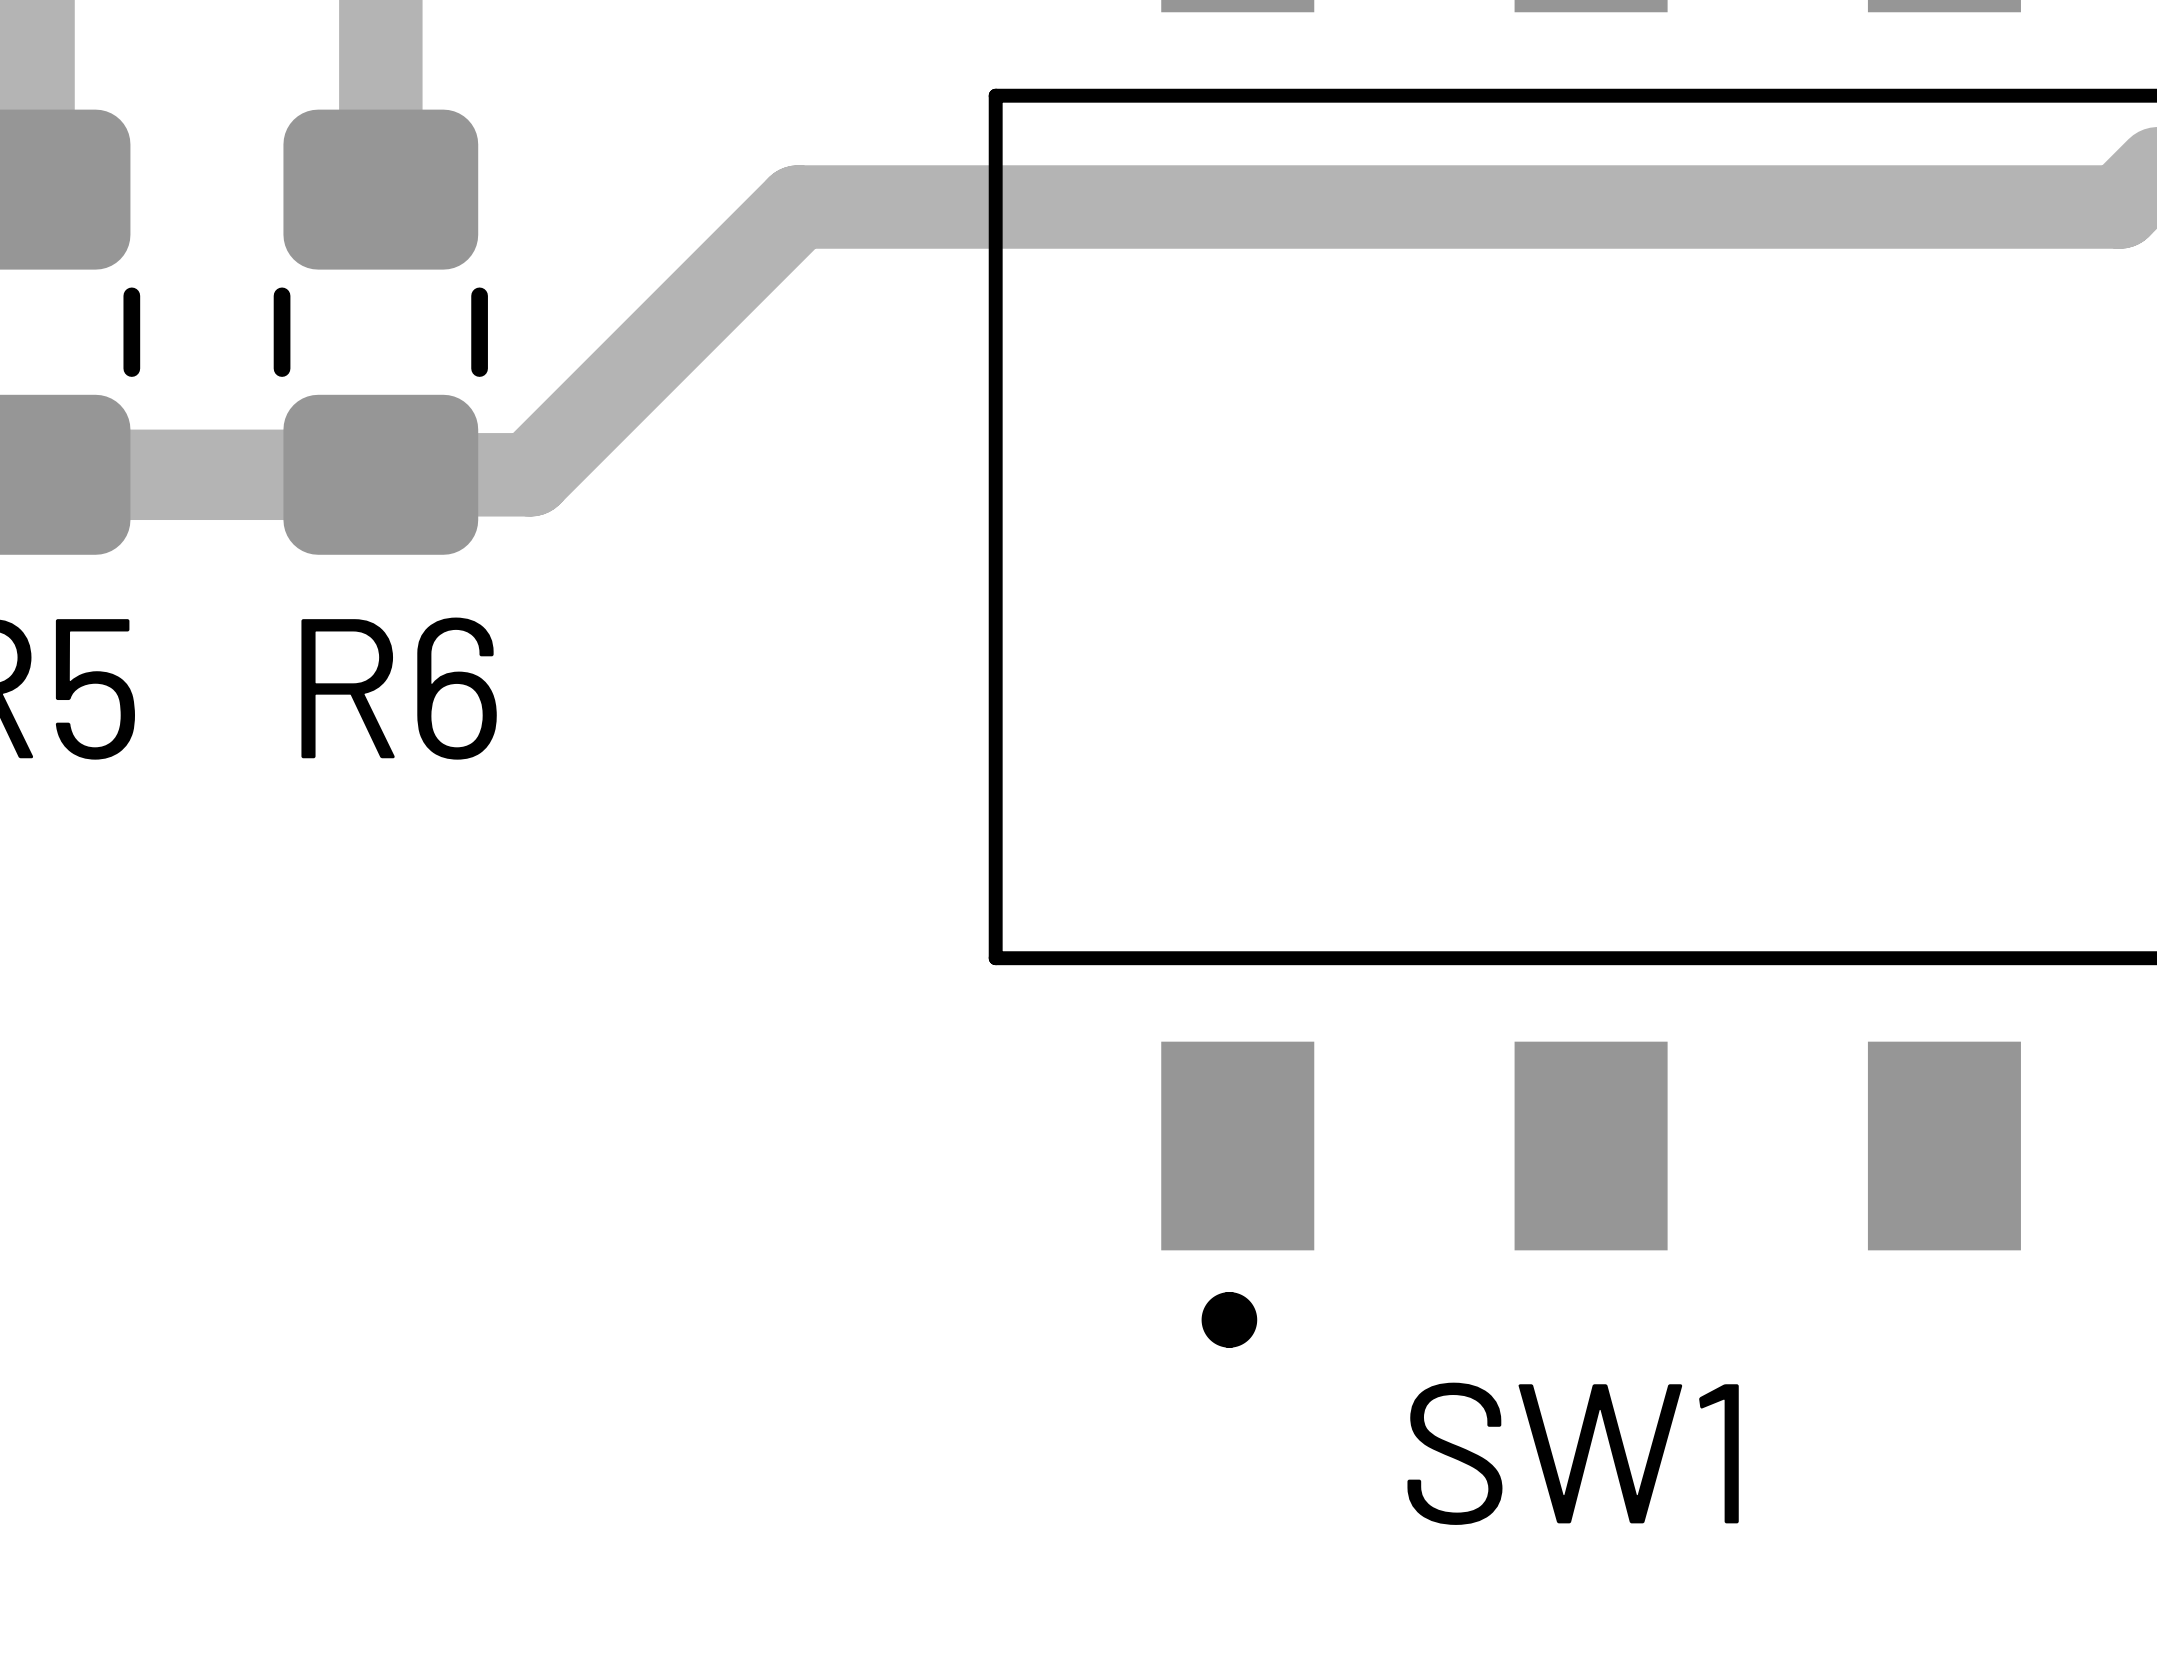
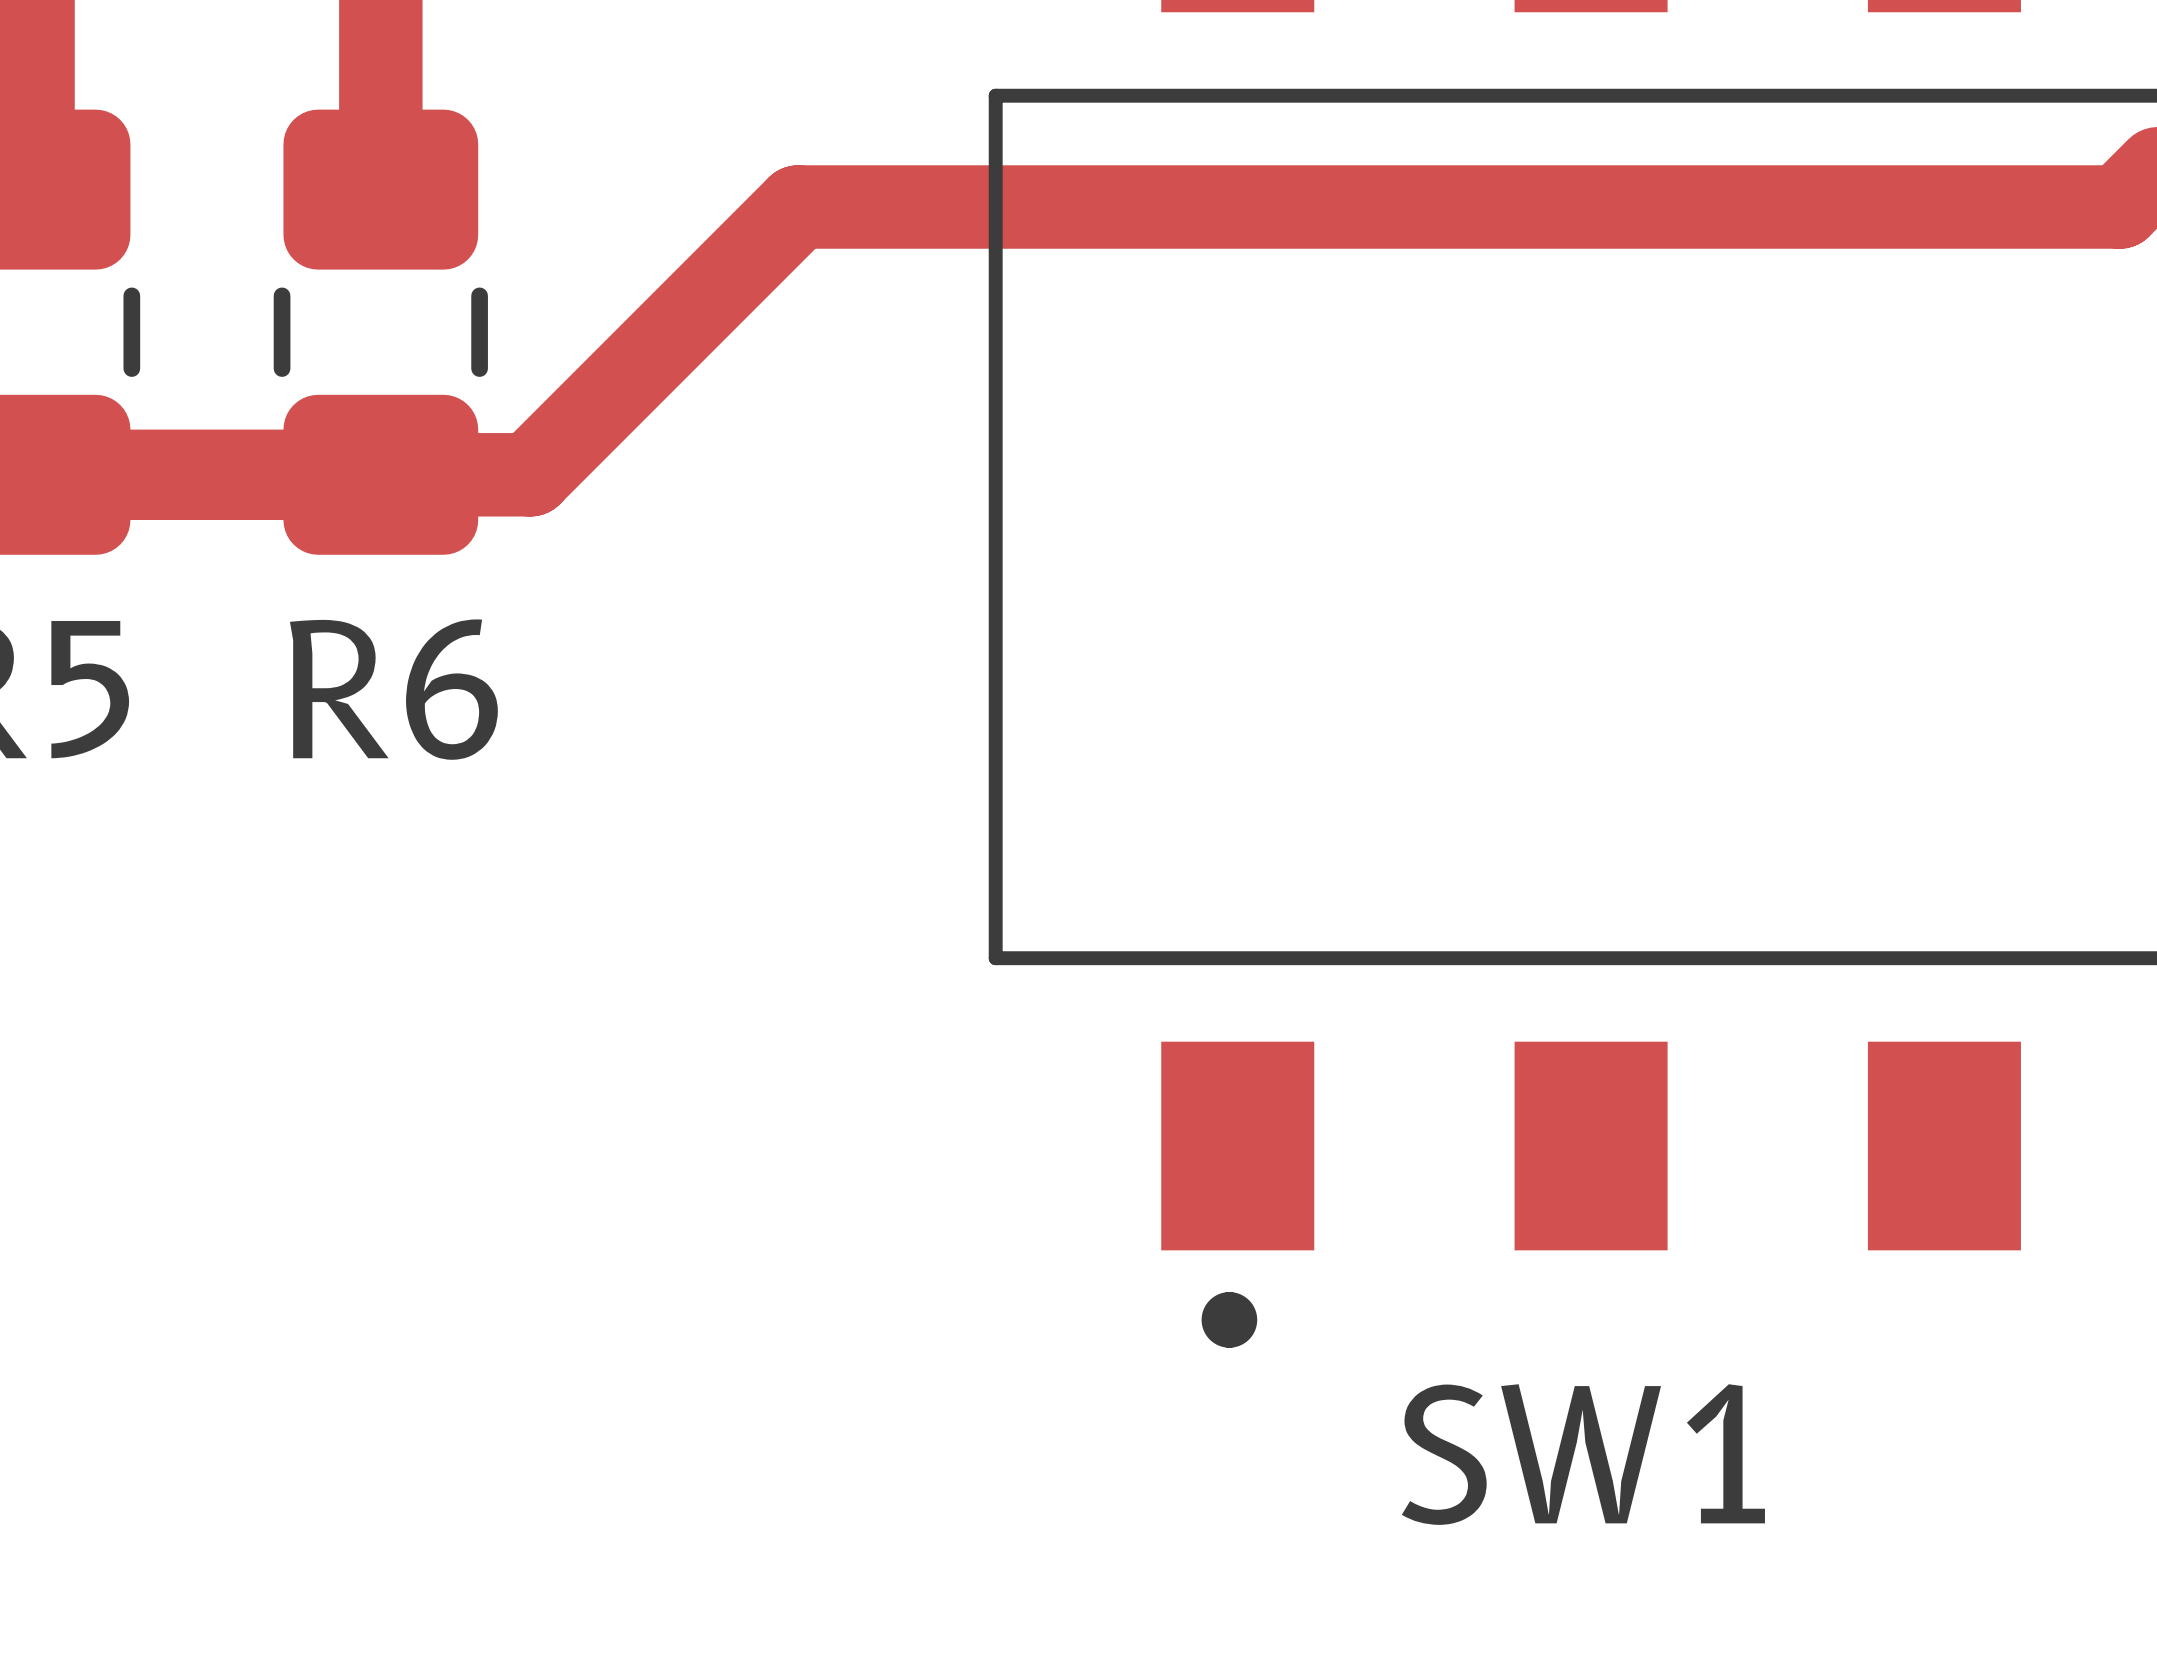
SW1 name position: SW1 (1573, 1453) -> SW1 (1583, 1454)

